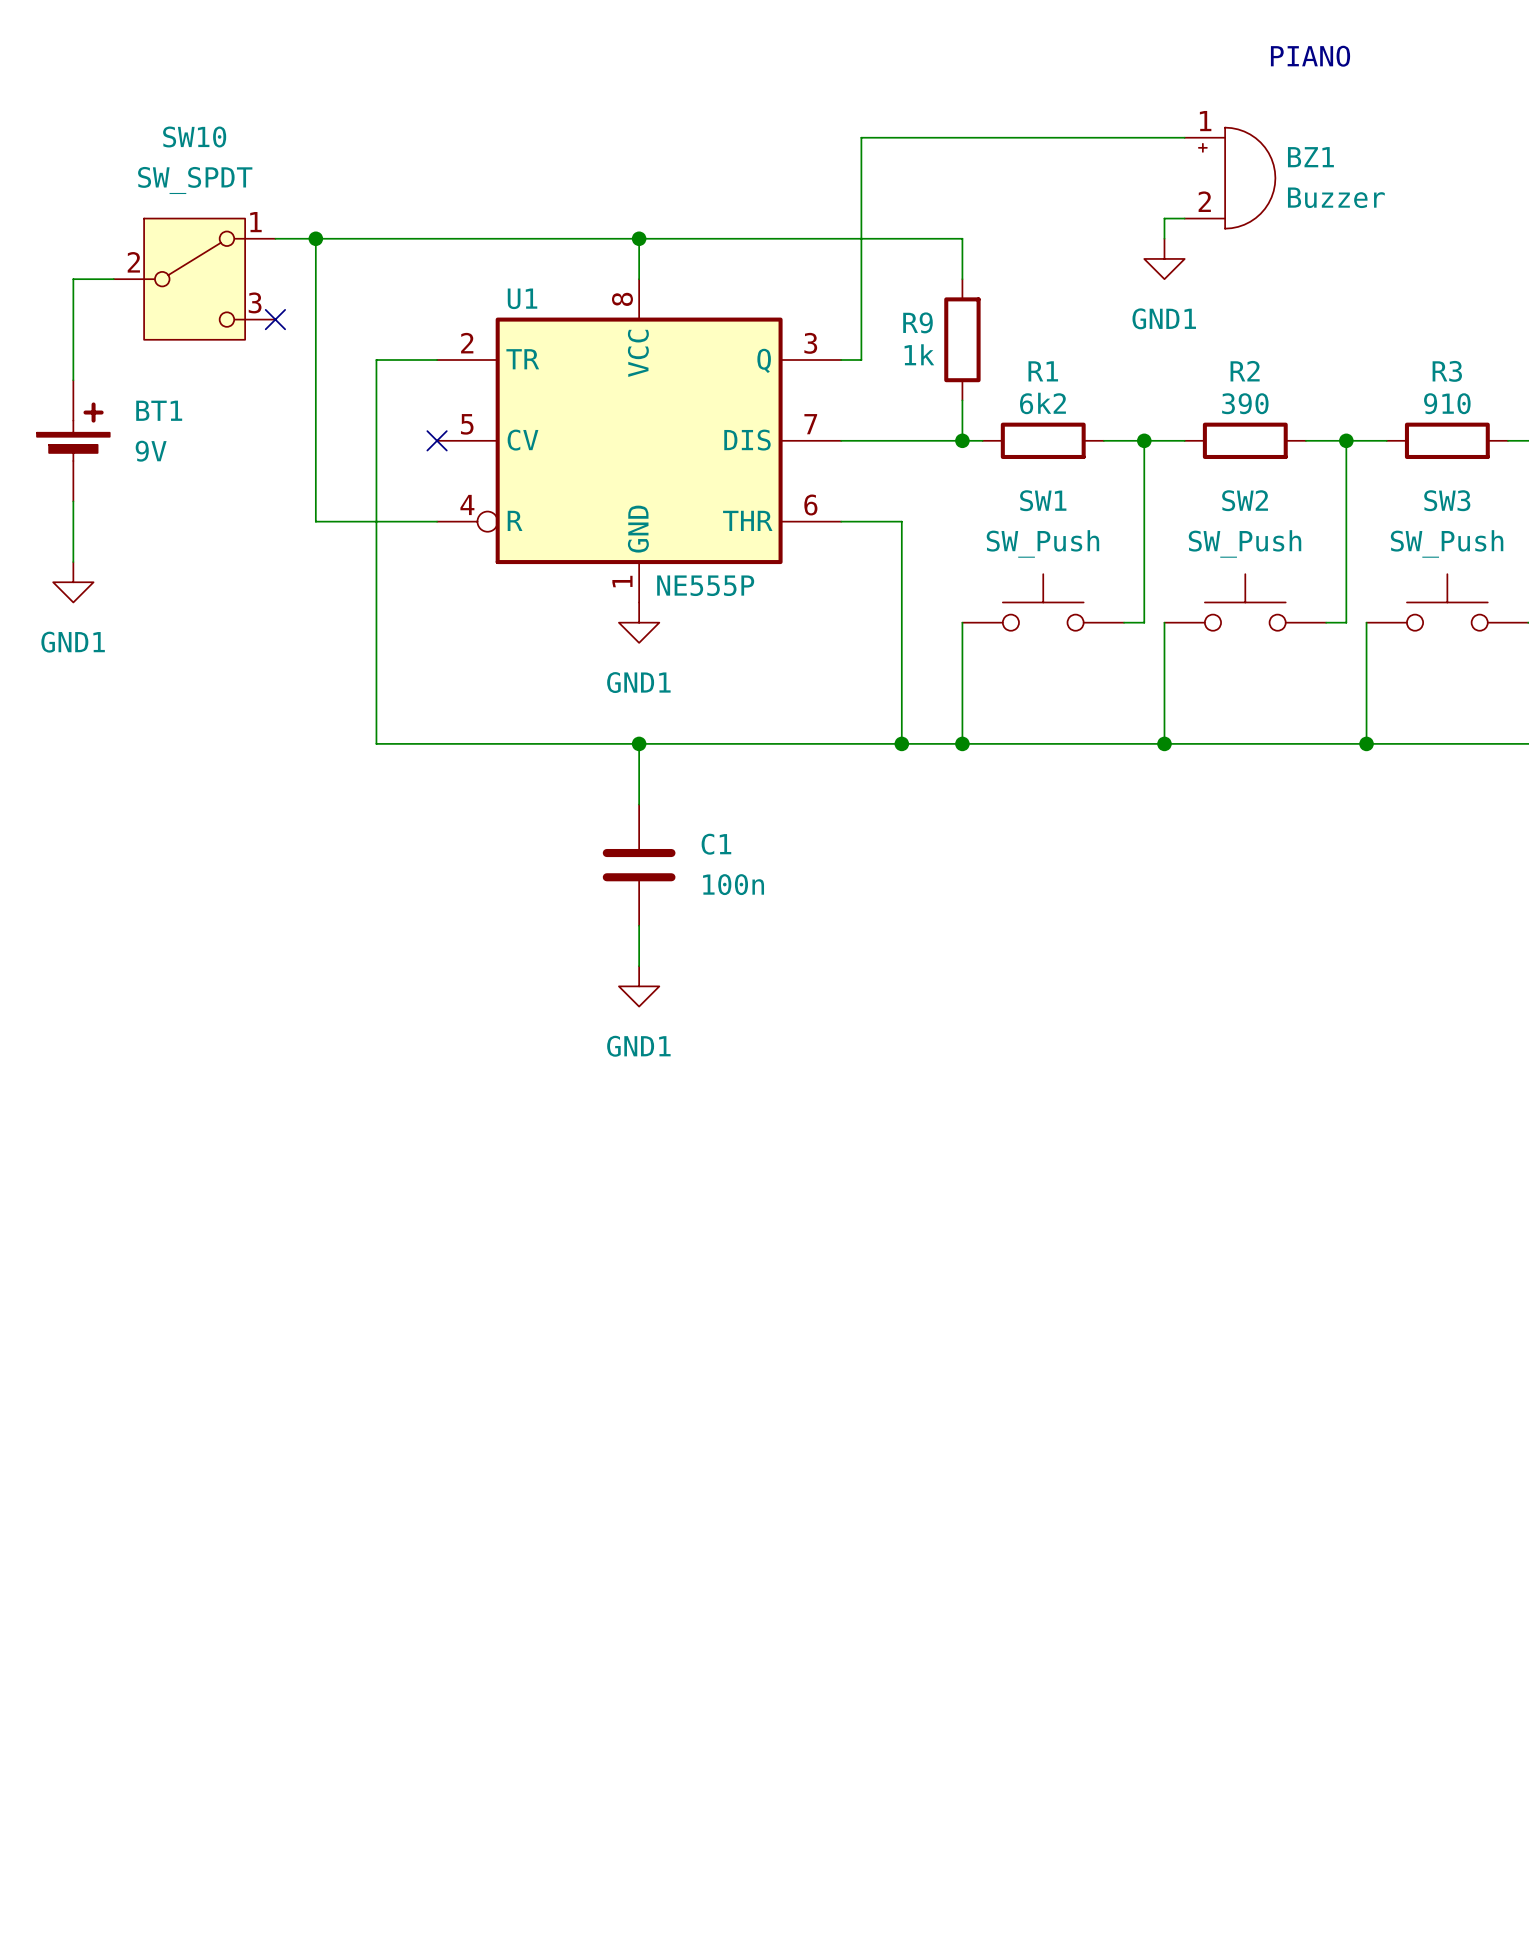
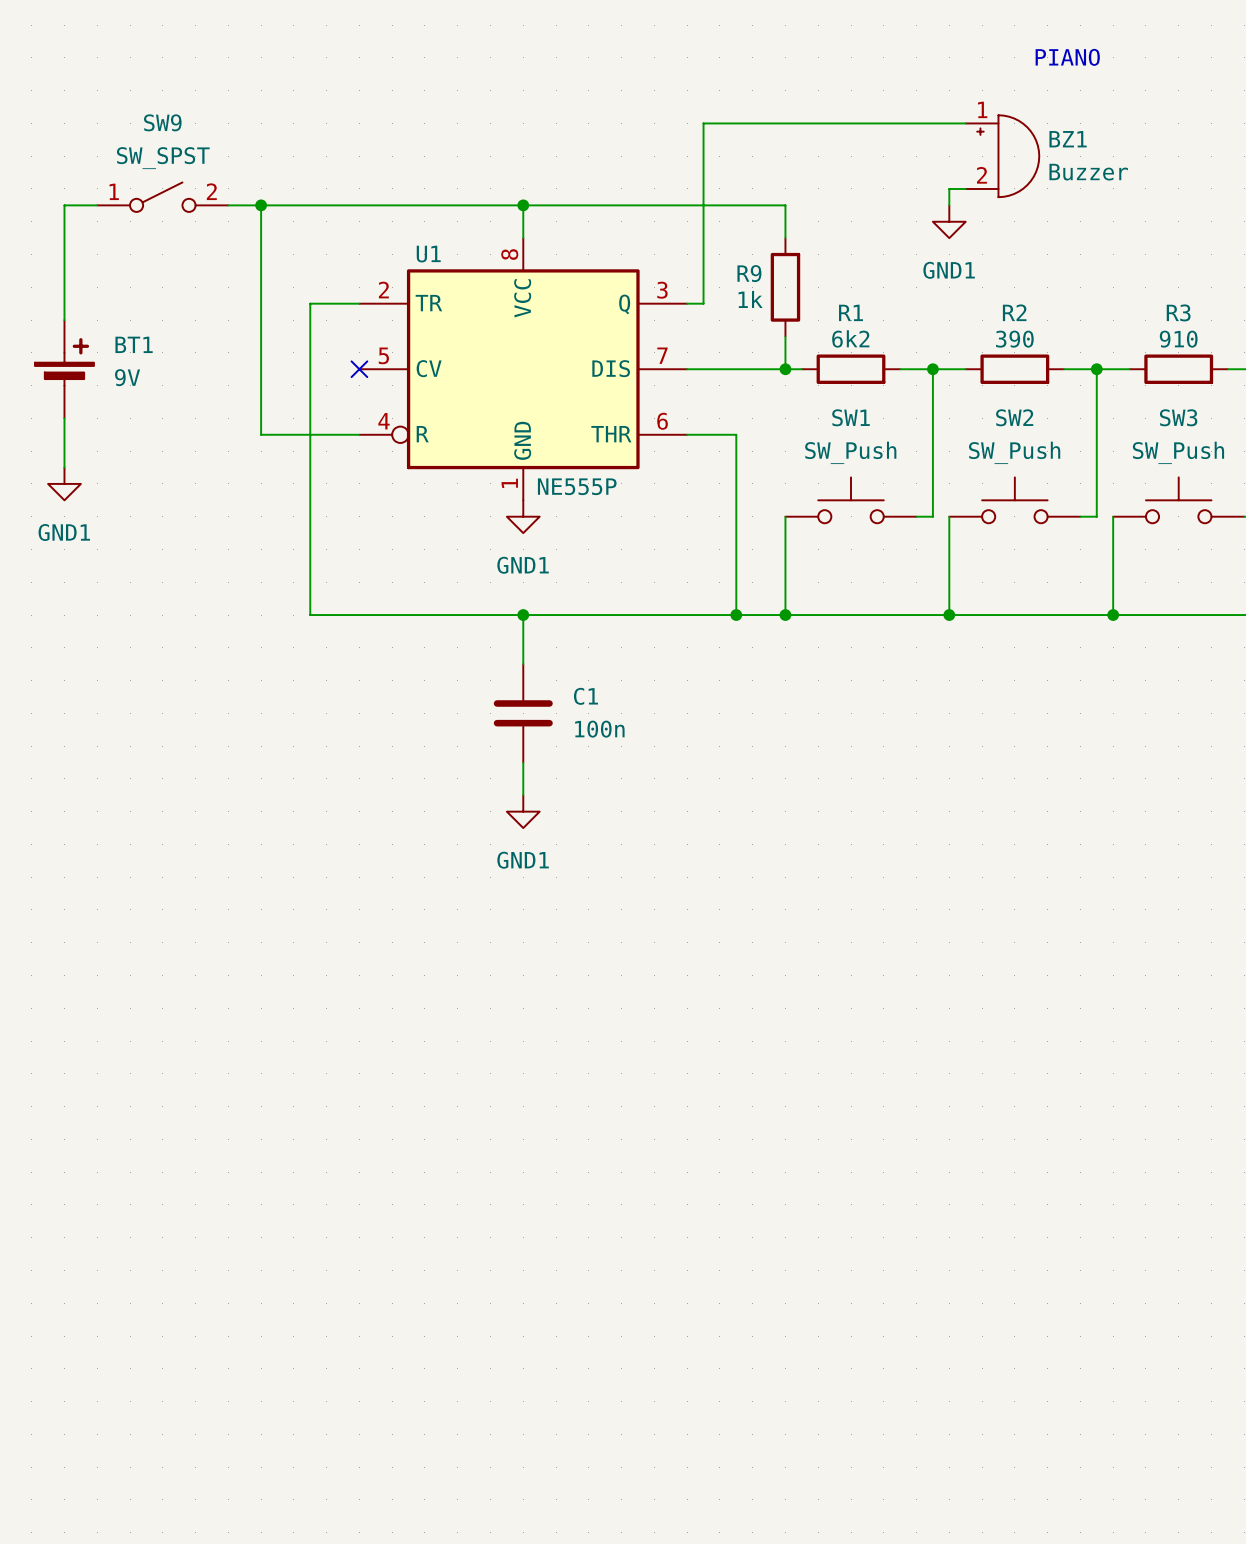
SW9: none -> SW_SPST (162, 197)
wire: (73, 279) (113, 279) -> (64, 238) (64, 205) (97, 205)
SW10: SW_SPDT (194, 279) -> none
no-connect mark: (275, 319) -> none

